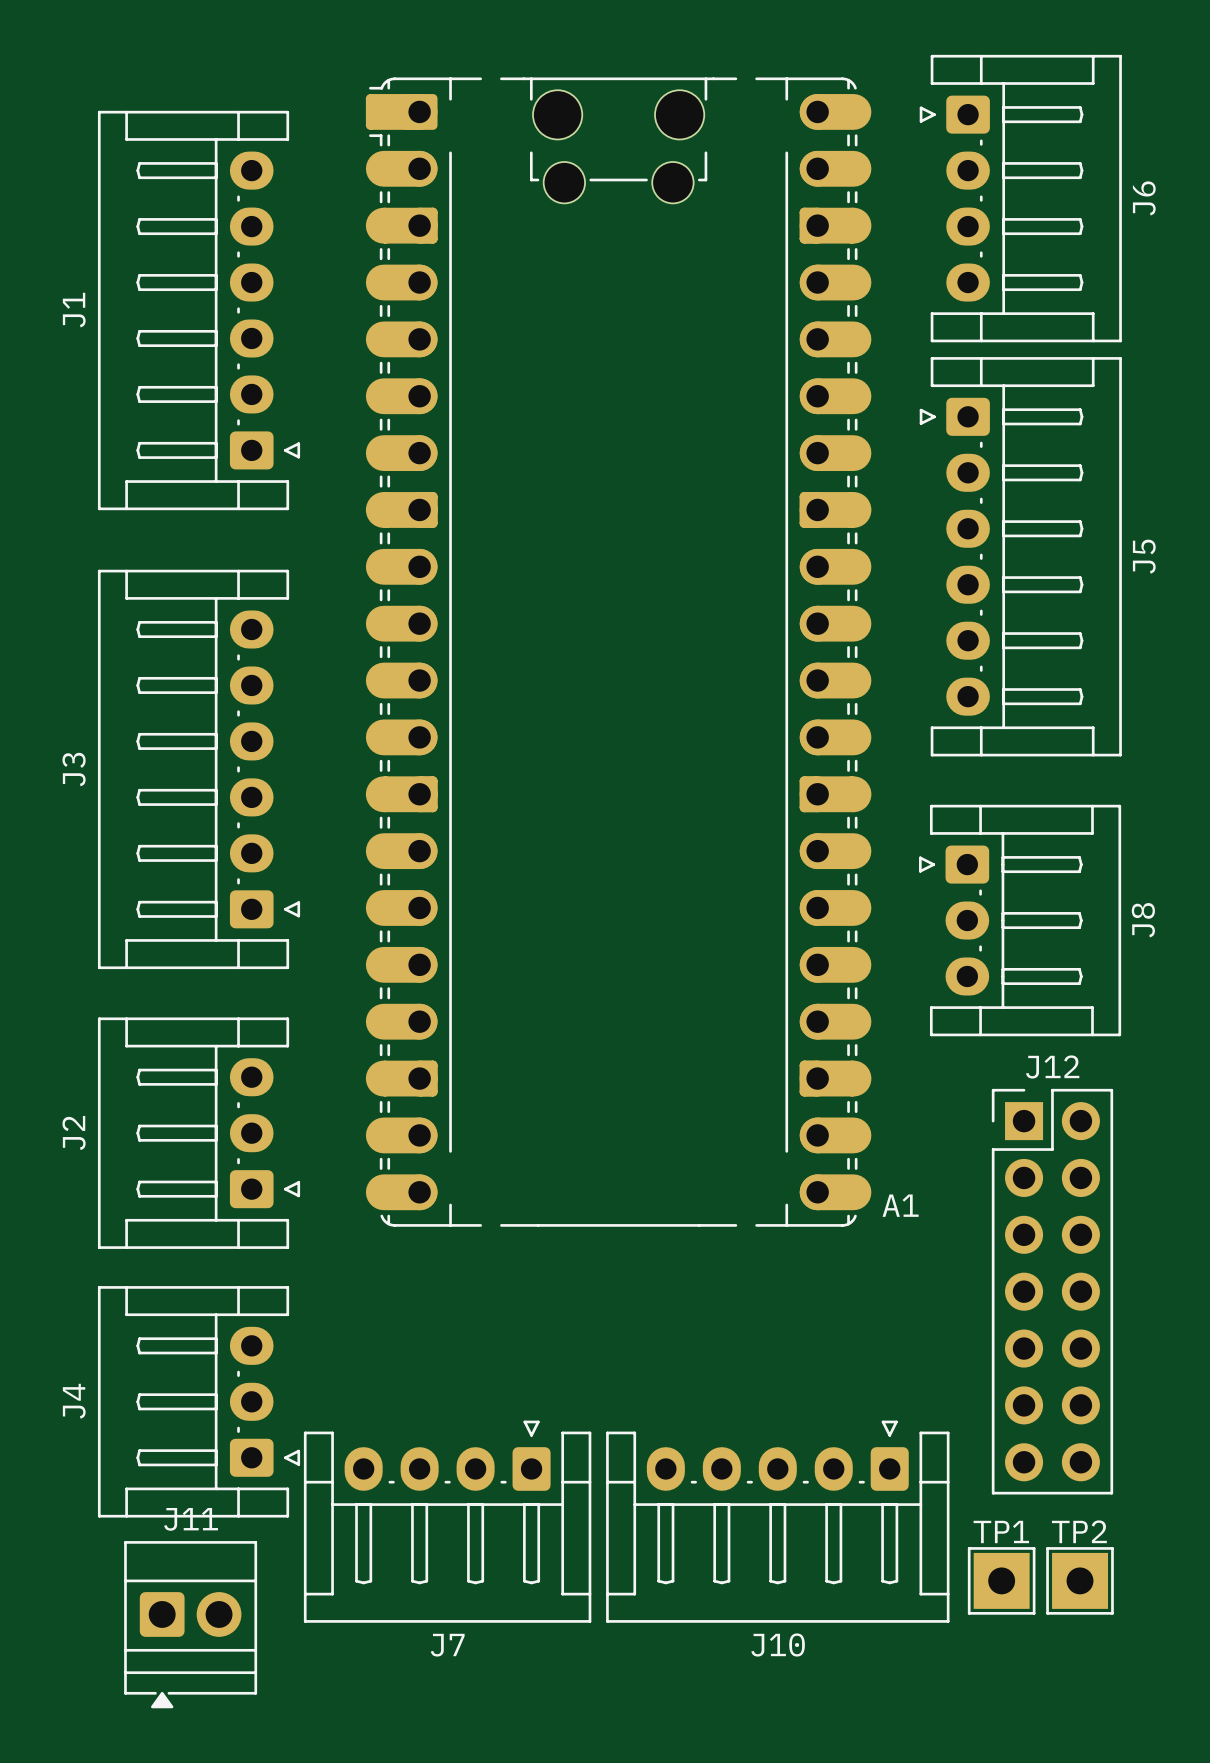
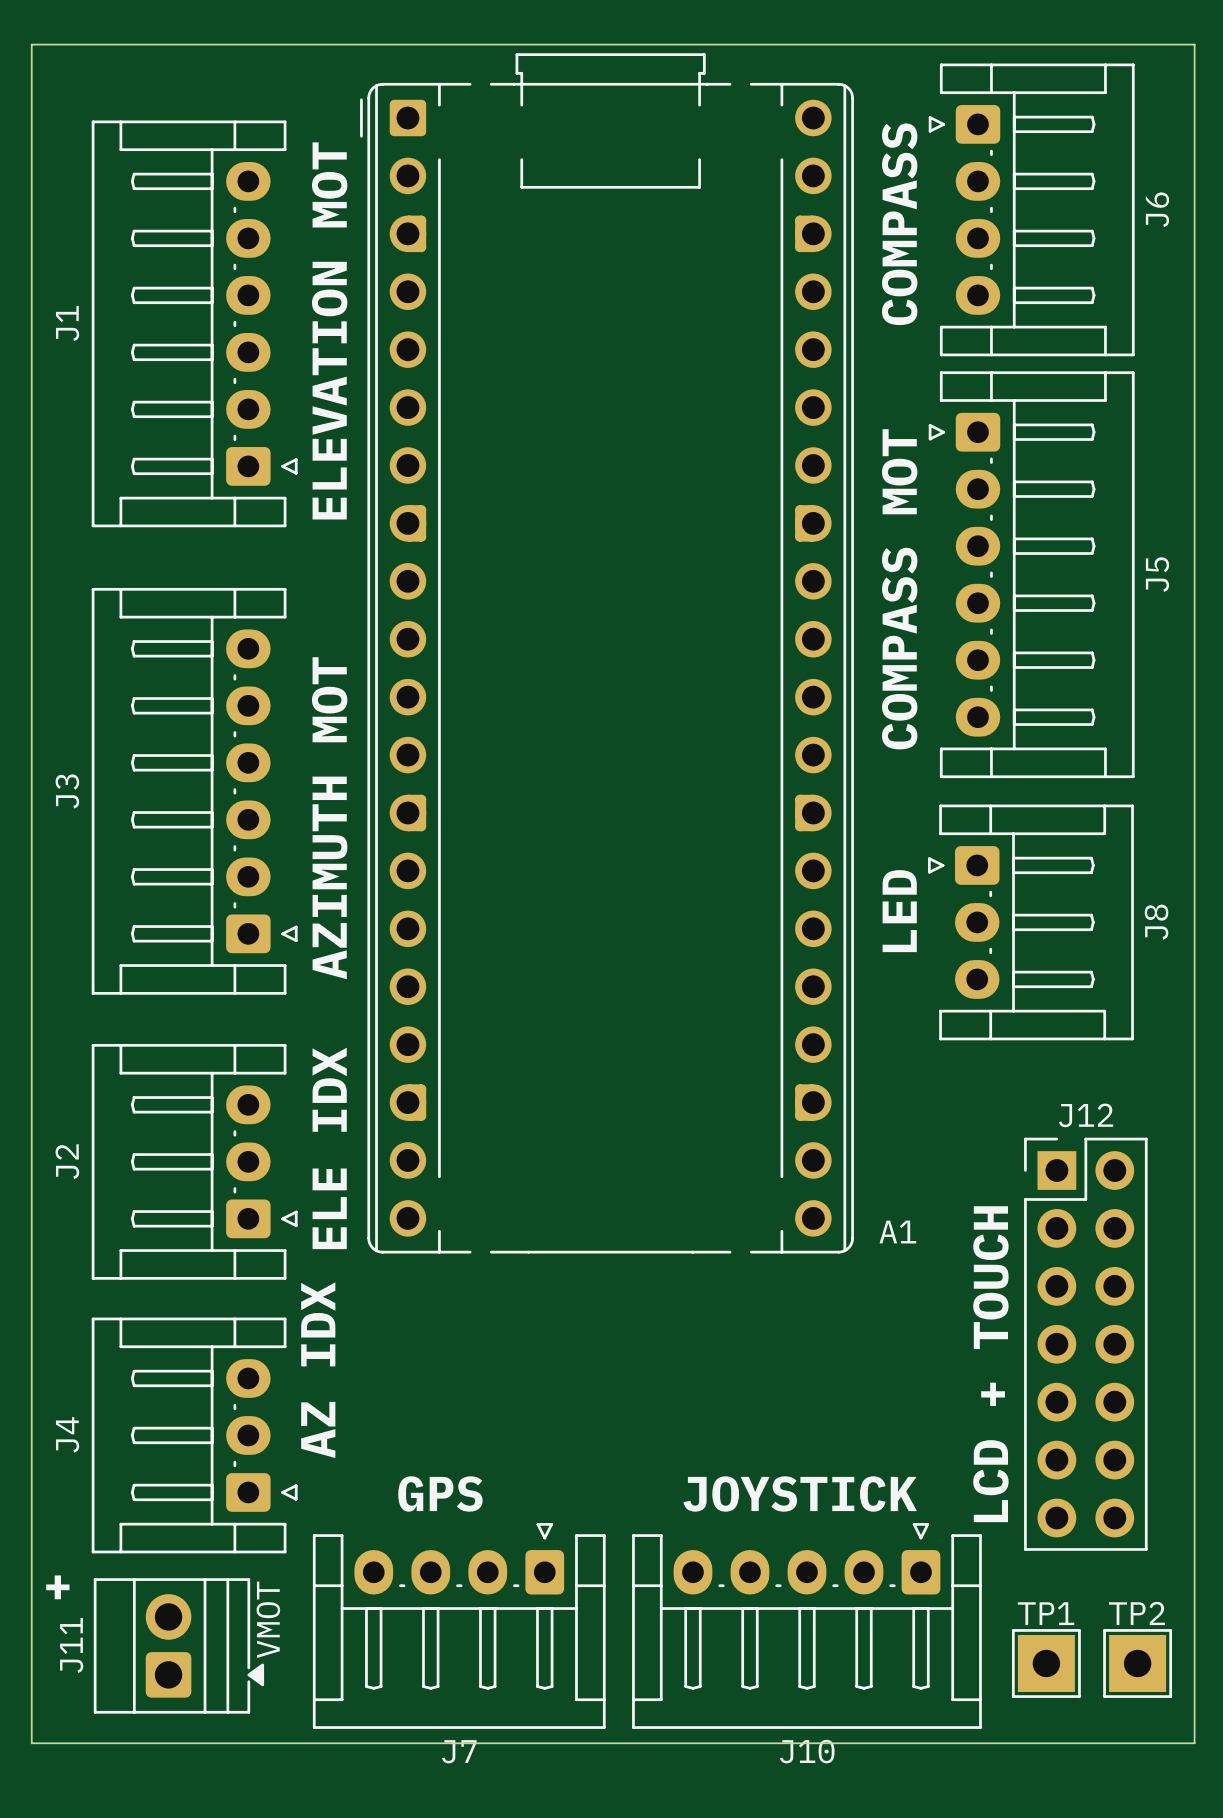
board edge: none -> (31, 44) (1194, 44) (1194, 1743) (31, 1743) (31, 44)
A1 footprint: [365, 77, 872, 1227] -> [360, 53, 854, 1254]
text: none -> COMPASS (899, 224)
text: none -> ELEVATION MOT (329, 330)
text: none -> COMPASS MOT (899, 589)
text: none -> AZIMUTH MOT (329, 818)
text: none -> LED (899, 911)
J8 position: (1020, 920) -> (1030, 922)
text: none -> ELE IDX (329, 1148)
J12 position: (1052, 1291) -> (1085, 1344)
text: none -> LCD + TOUCH (990, 1364)
text: none -> AZ IDX (318, 1370)
text: none -> GPS (440, 1493)
text: none -> JOYSTICK (800, 1493)
J7 position: (447, 1521) -> (459, 1625)
J10 position: (777, 1521) -> (806, 1625)
text: none -> + (57, 1587)
TP1 position: (1001, 1580) -> (1046, 1663)
TP2 position: (1080, 1580) -> (1137, 1663)
text: none -> VMOT (268, 1619)
J11 rotation: 0° (190, 1624) -> 90° counterclockwise (178, 1645)

